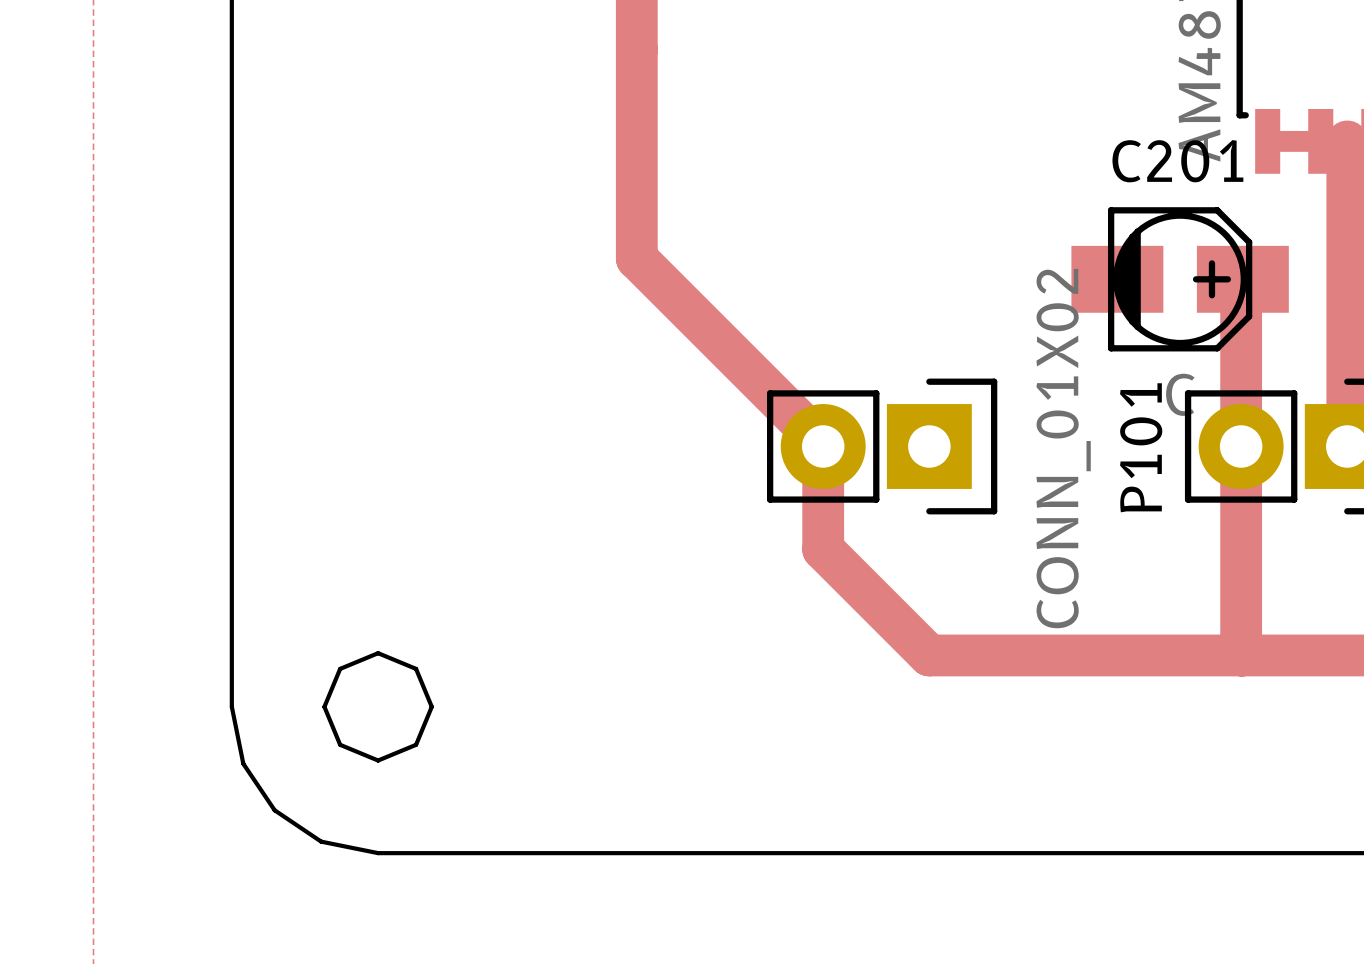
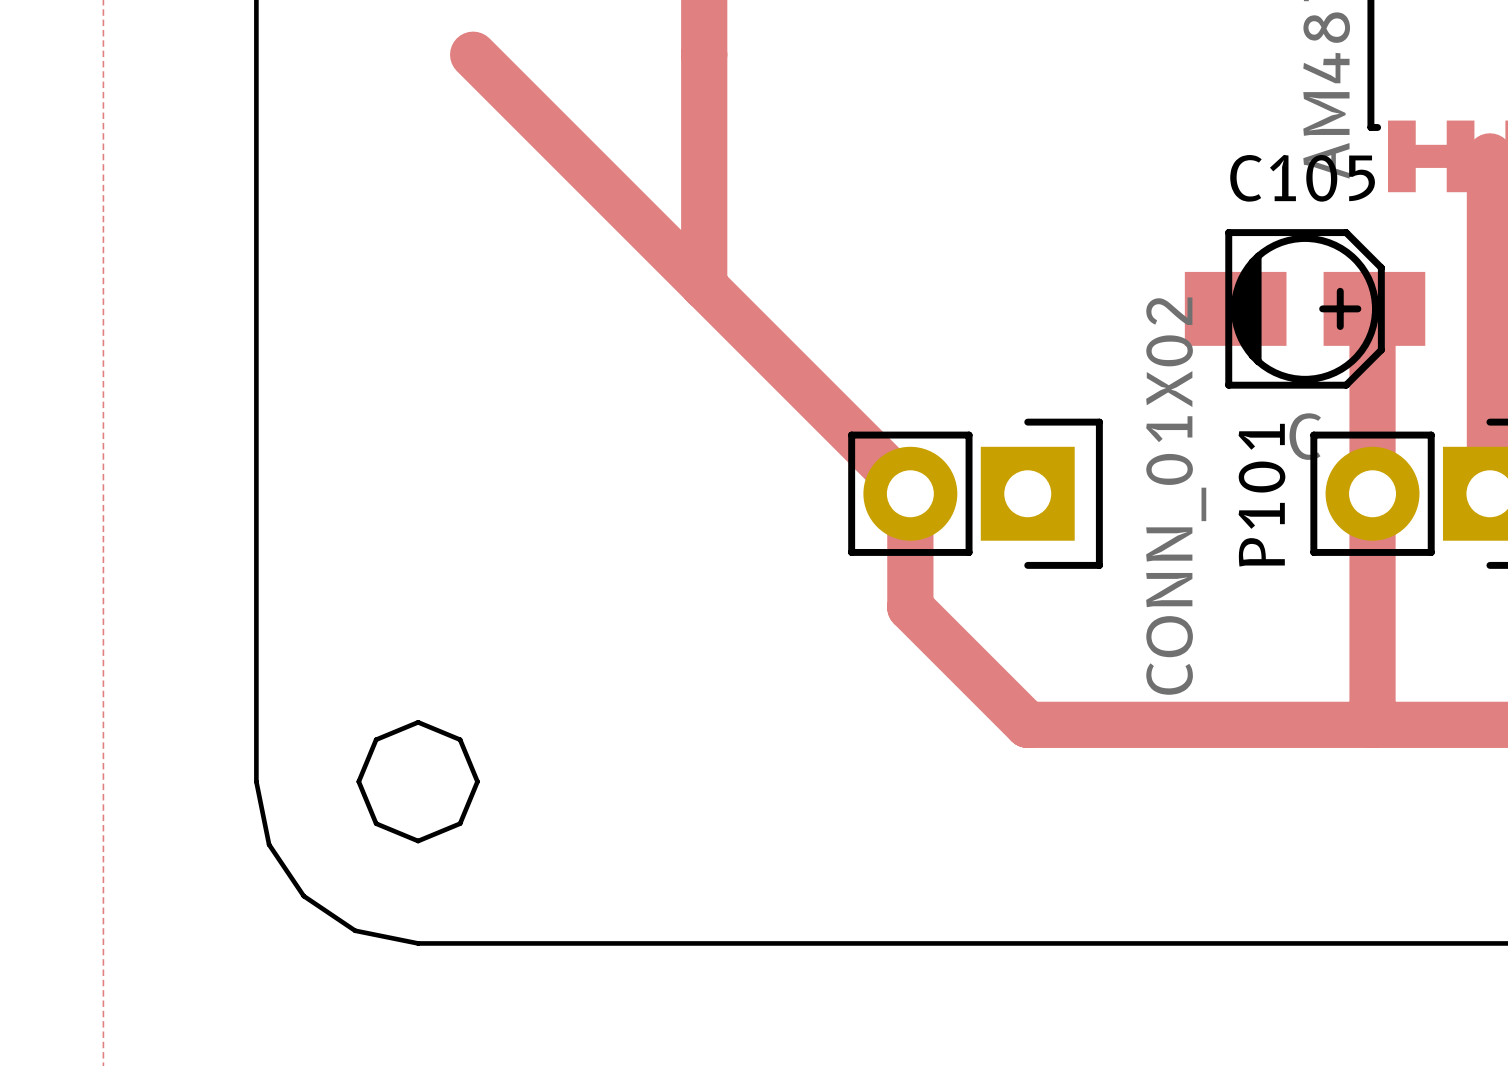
top track: none -> (473, 54) (704, 285)
C201 name: C201 (1177, 161) -> C105 (1302, 178)

